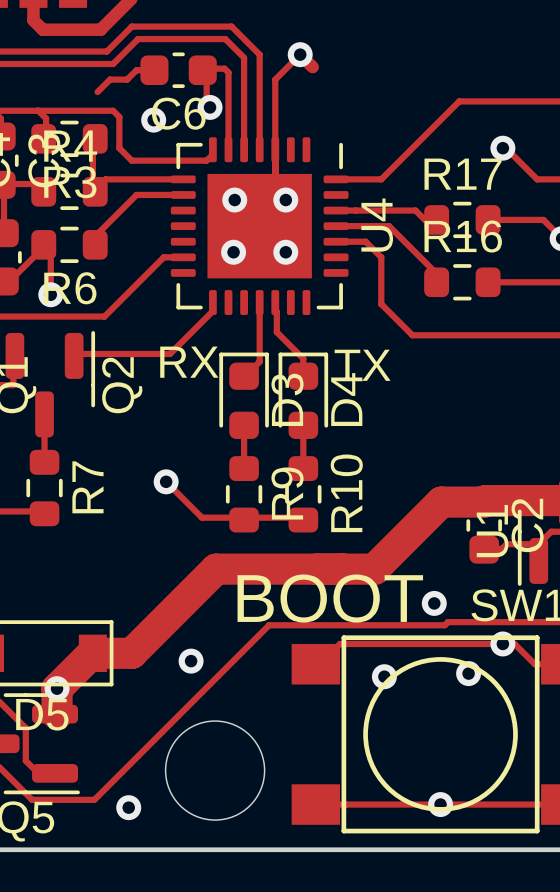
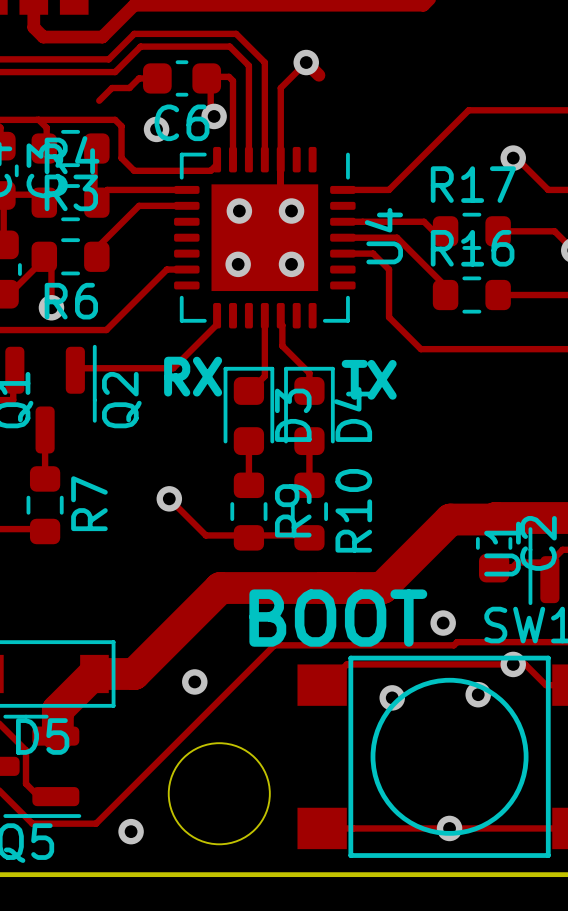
via: (57, 688) -> none

